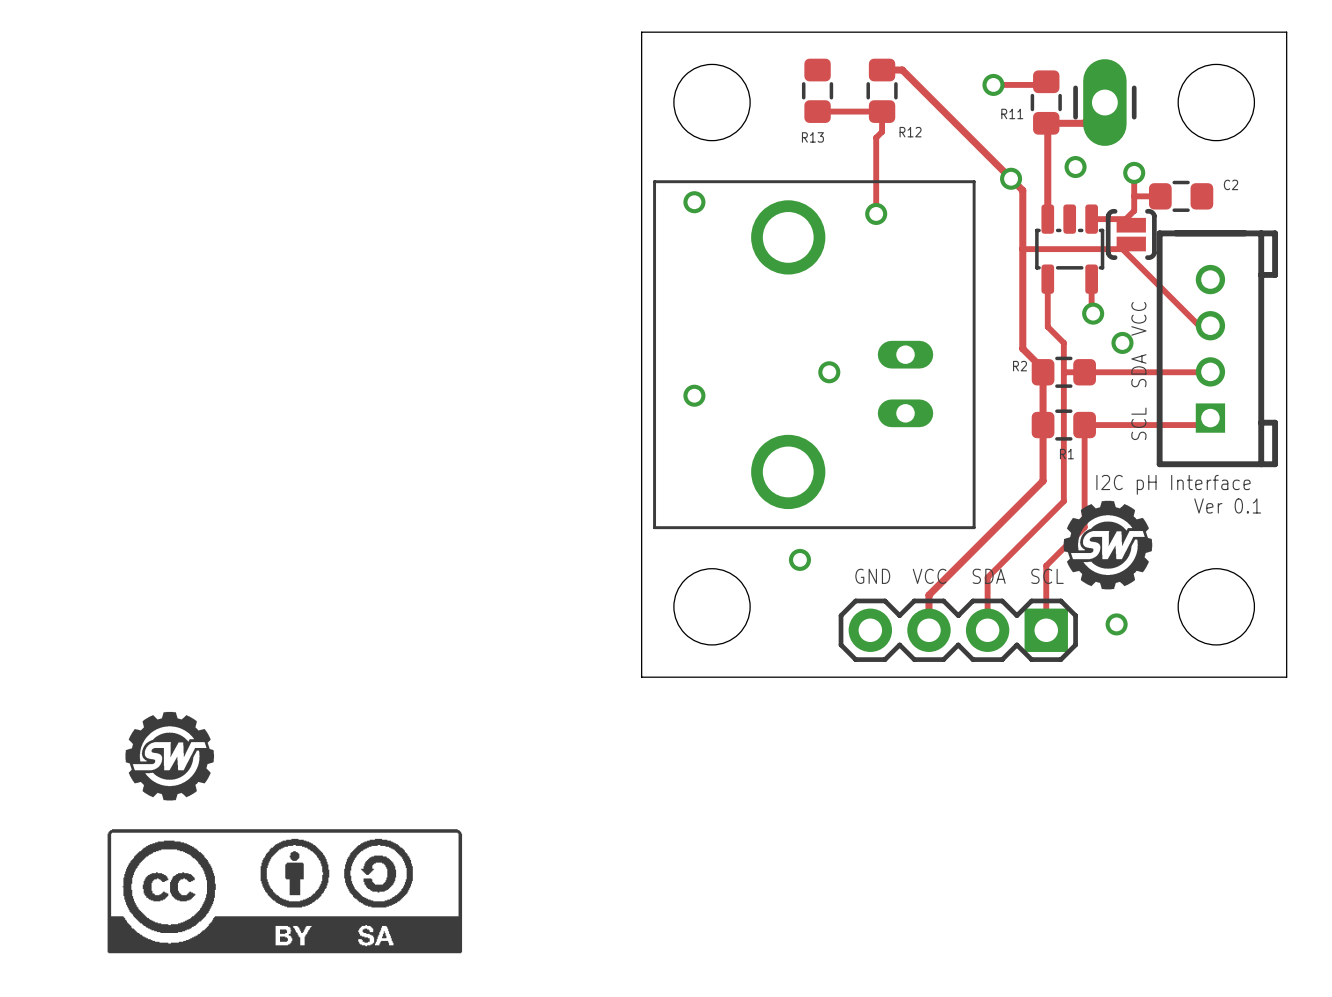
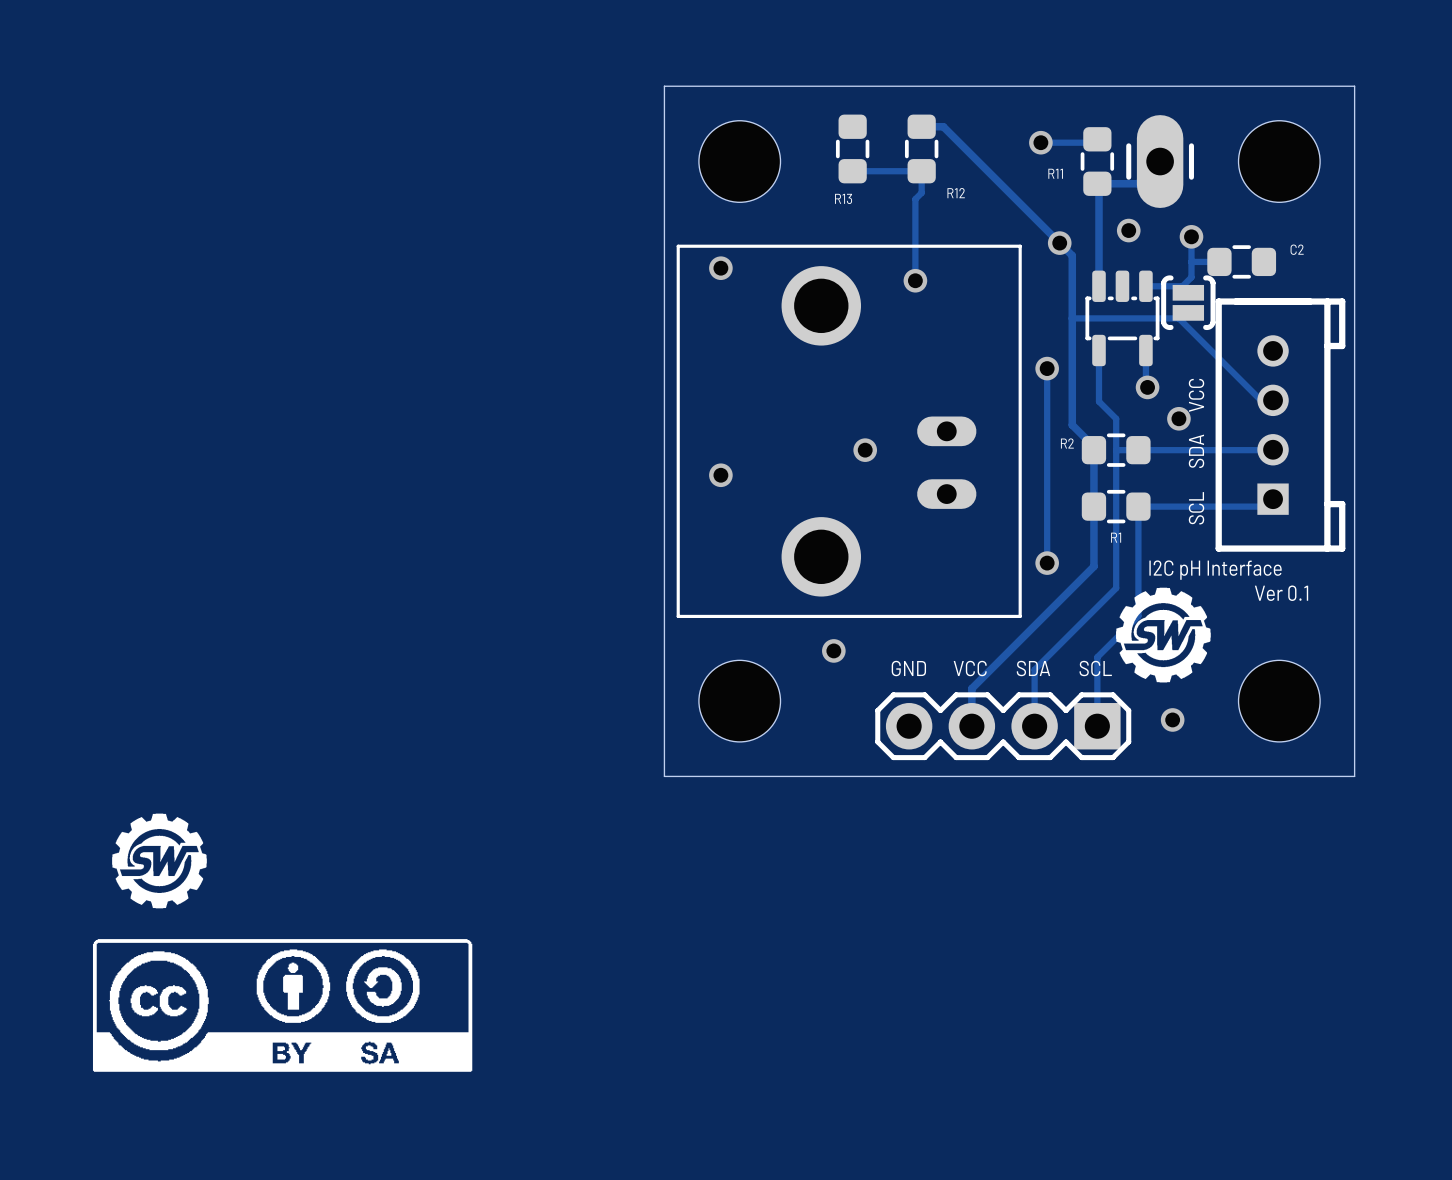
track: none -> (1047, 368) (1047, 563)
via: none -> (1047, 368)
via: none -> (1047, 563)

